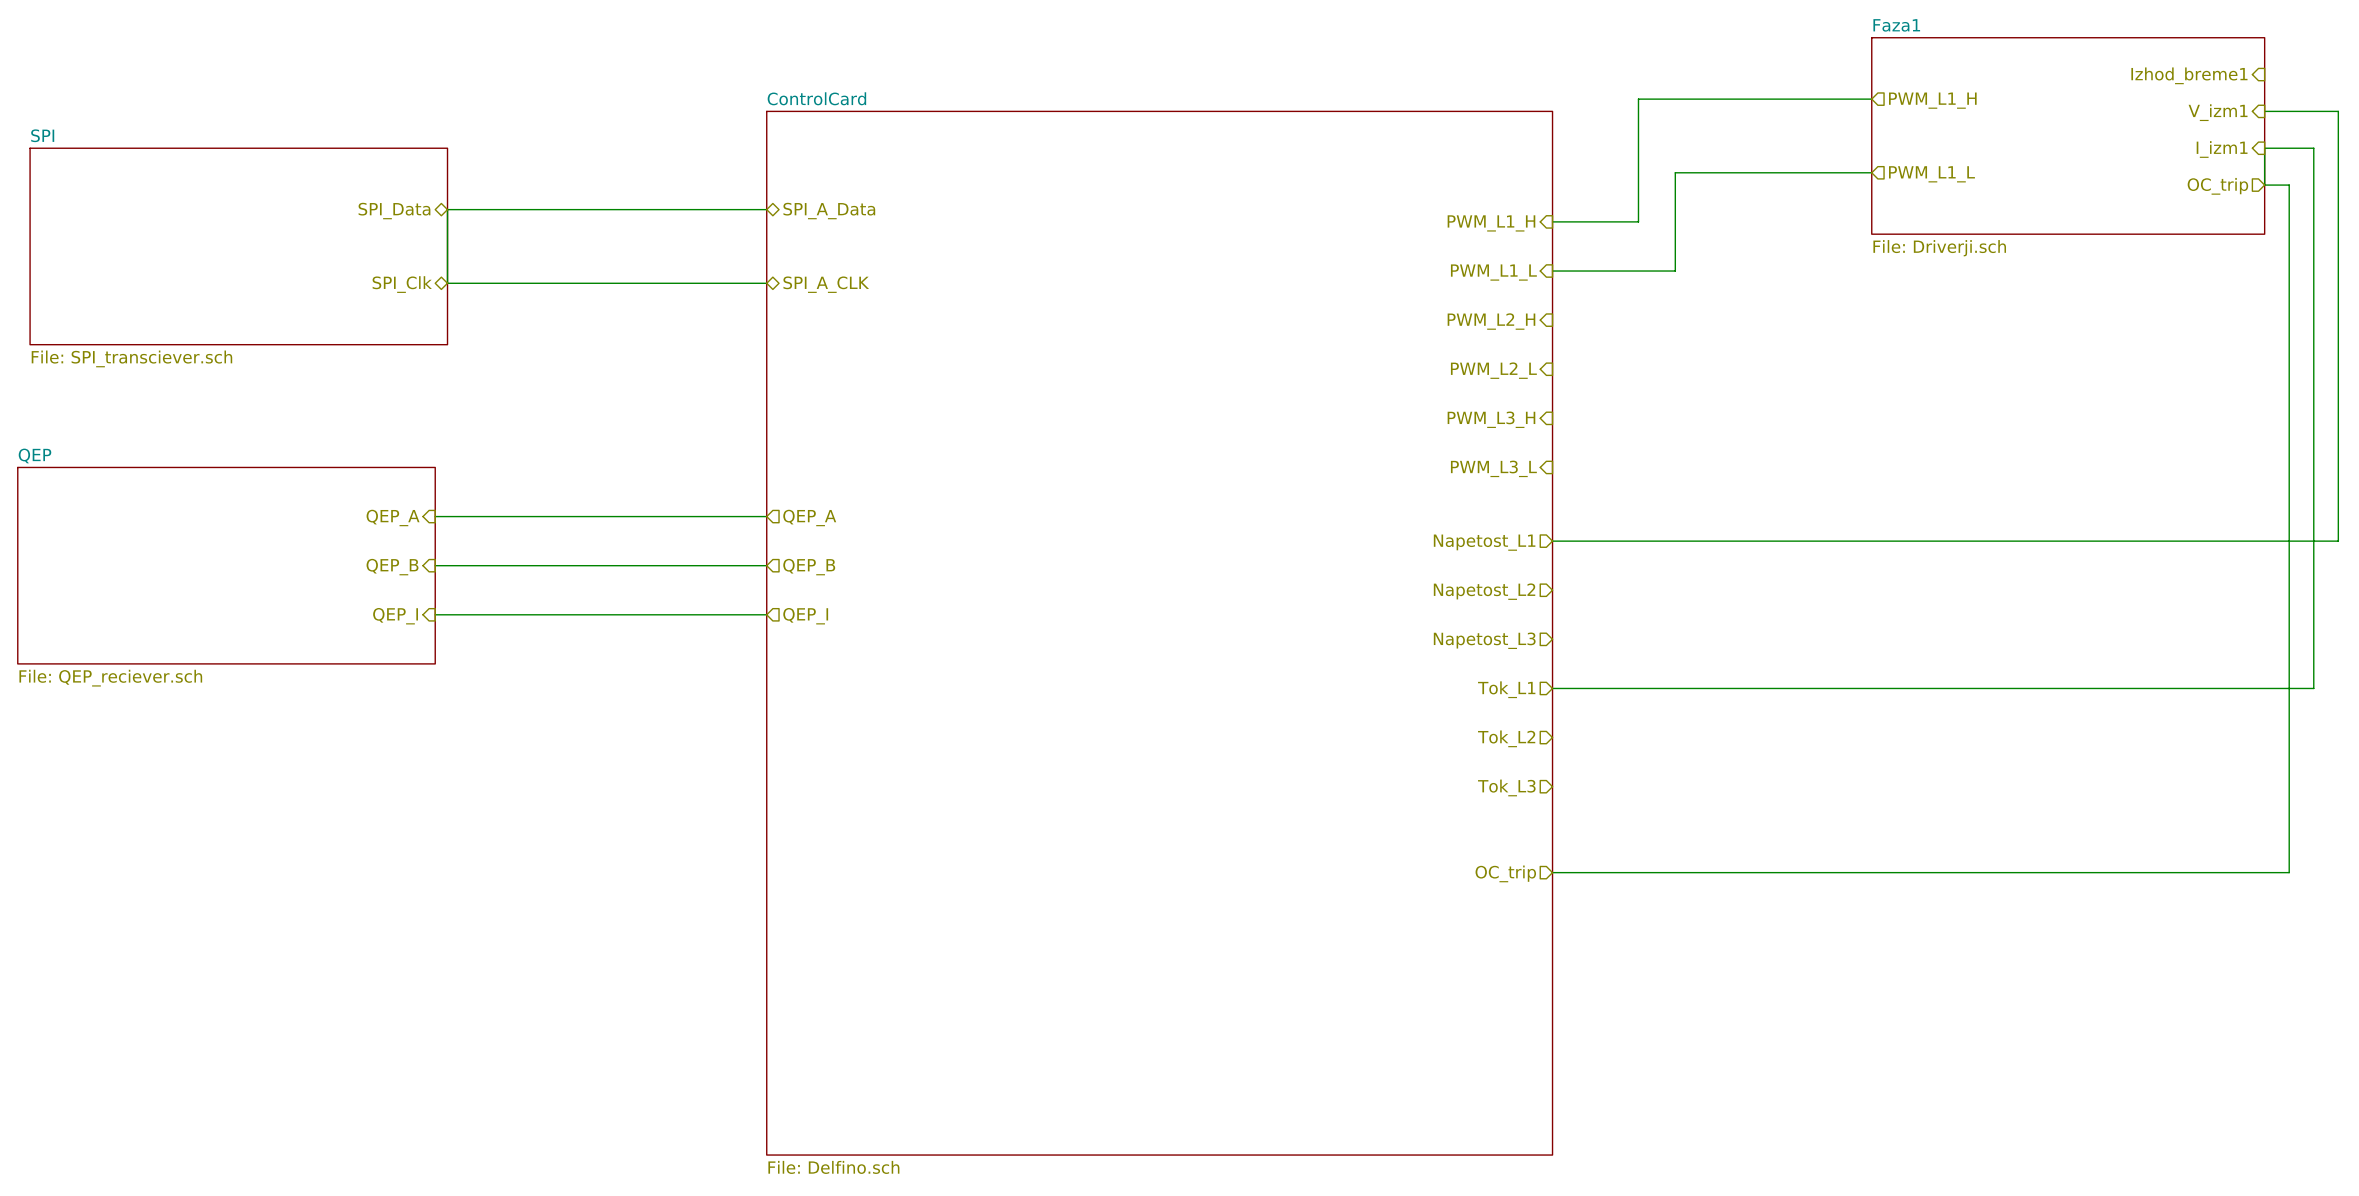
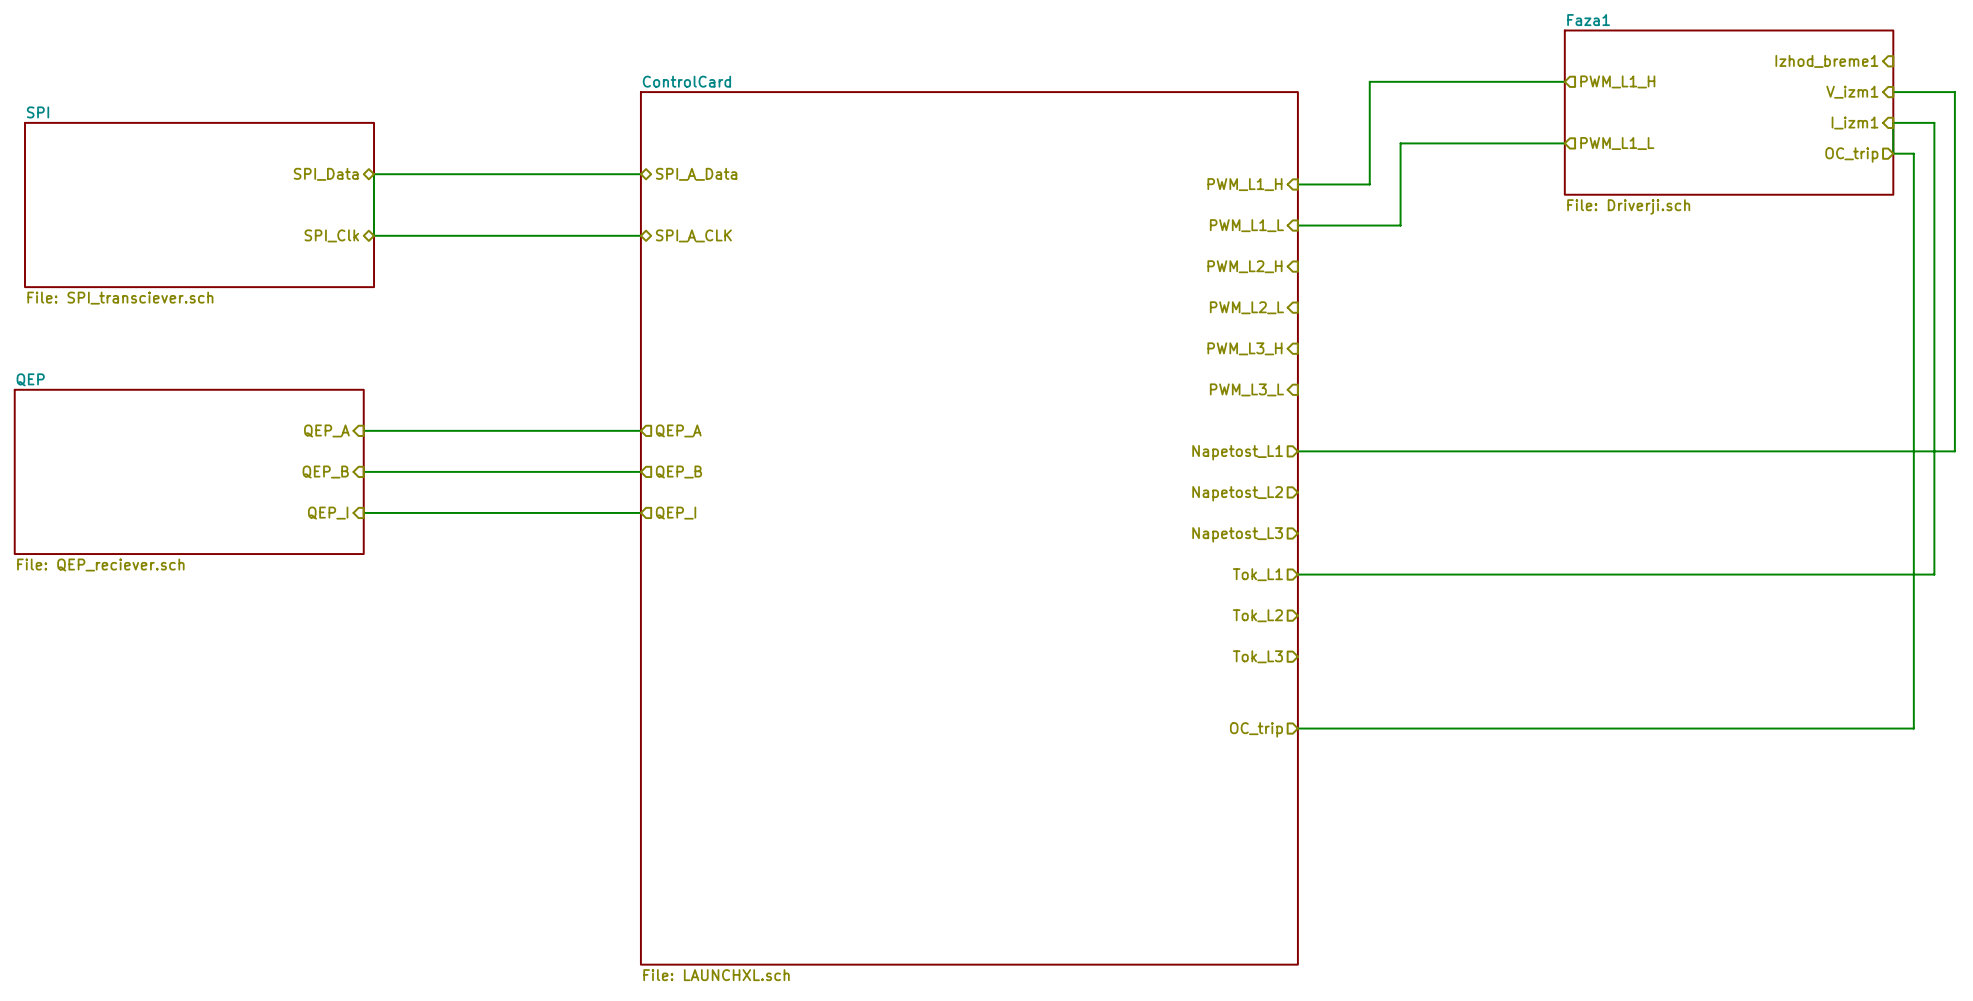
sheet ControlCard value: File: Delfino.sch (833, 1167) -> File: LAUNCHXL.sch (716, 975)

